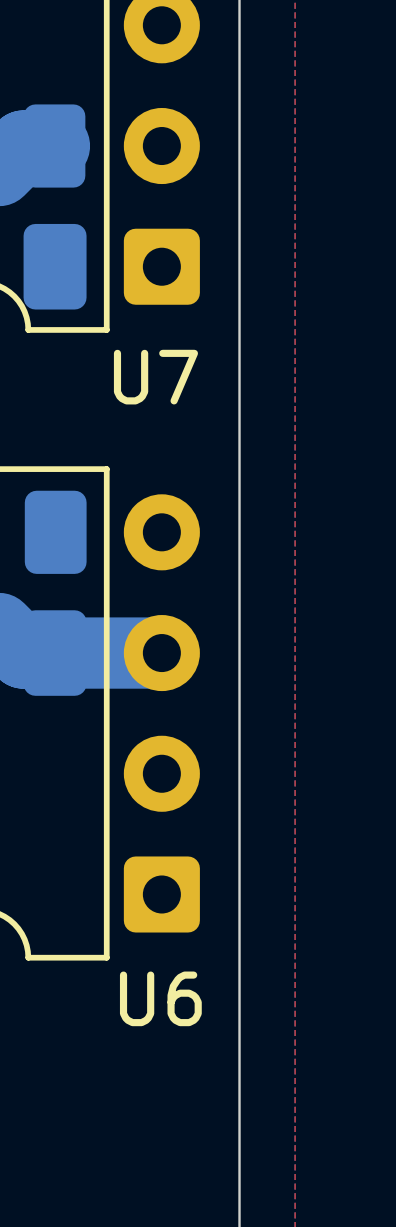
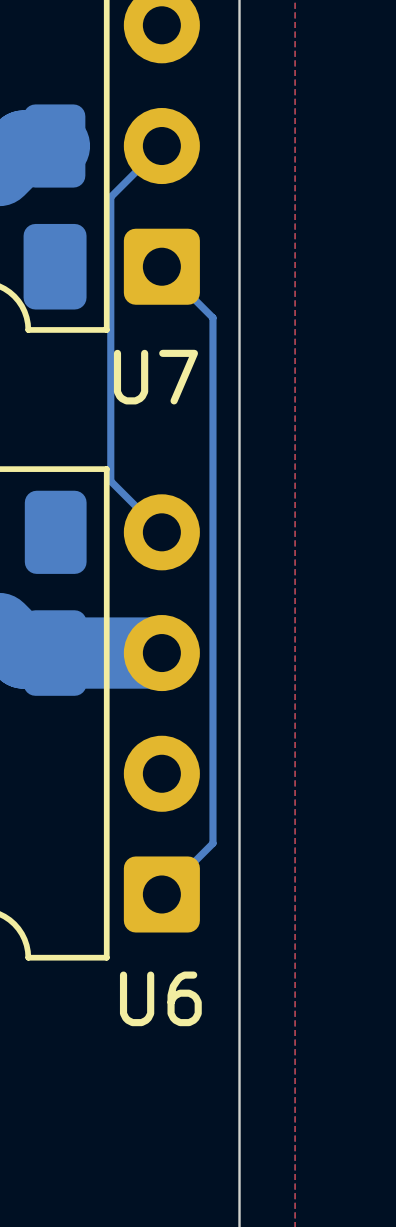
bottom track: none -> (161, 146) (110, 197) (110, 481) (161, 532)
bottom track: none -> (161, 266) (212, 317) (212, 843) (161, 894)

